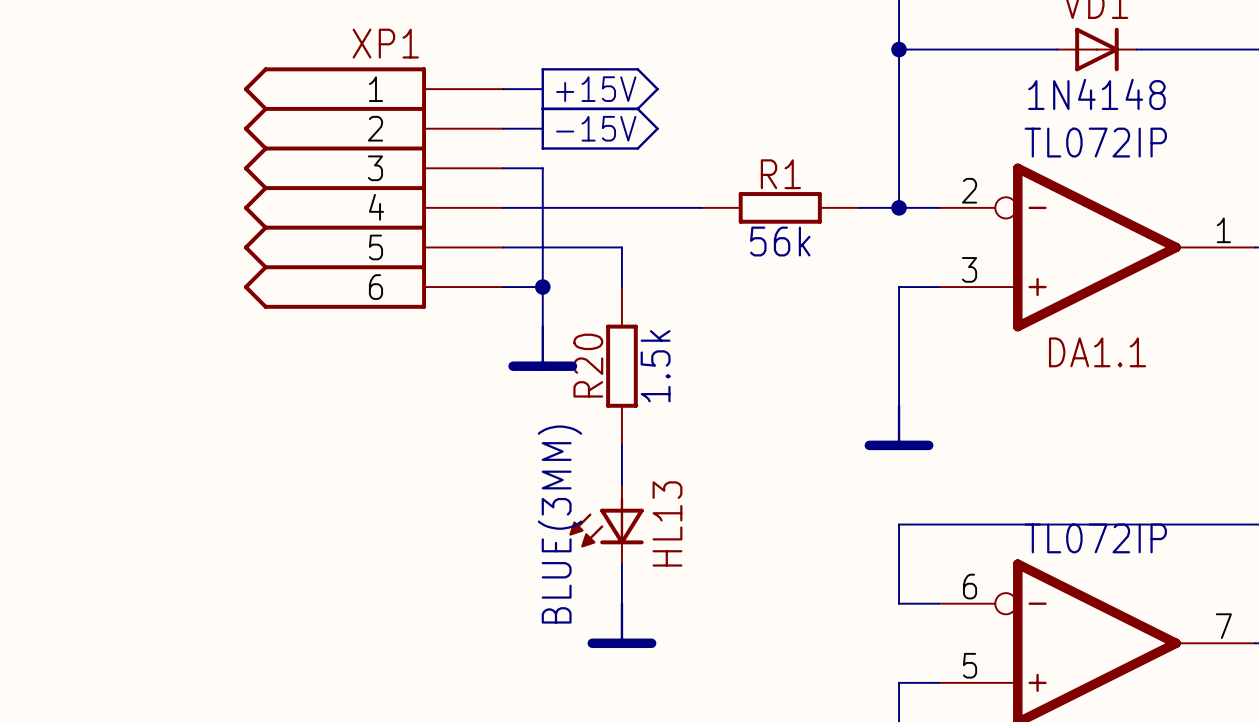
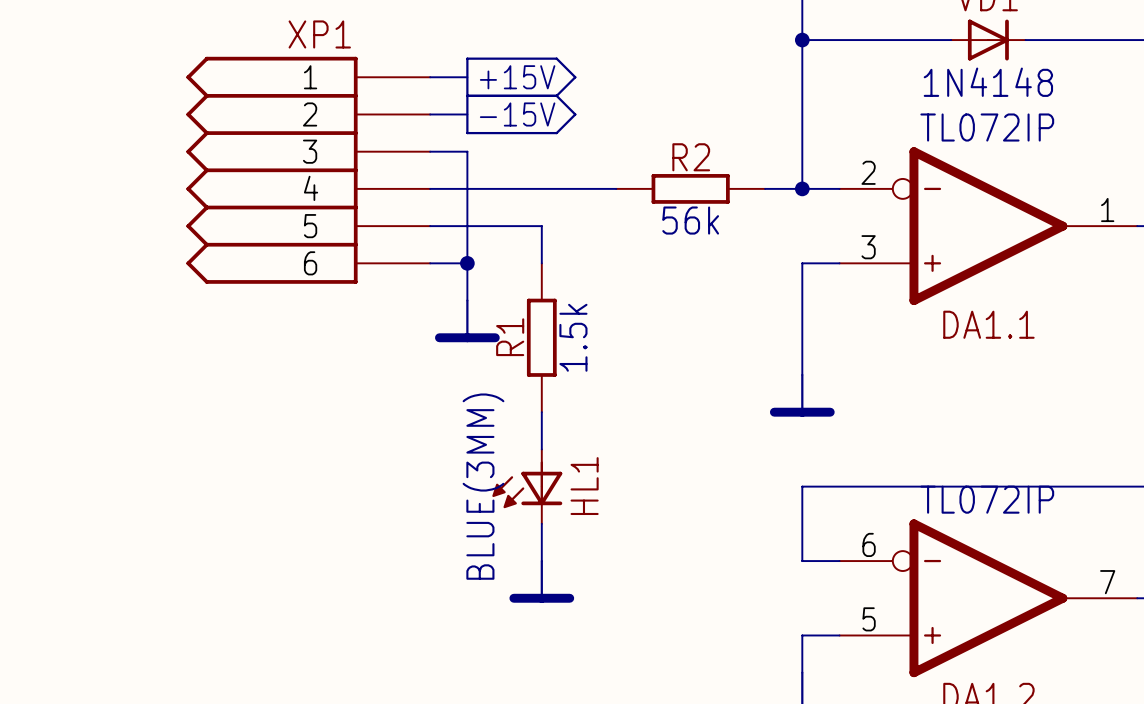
R1 name: R1 (780, 174) -> R2 (691, 157)
R20 name: R20 (588, 365) -> R1 (510, 337)
HL13 name: HL13 (667, 523) -> HL1 (584, 486)

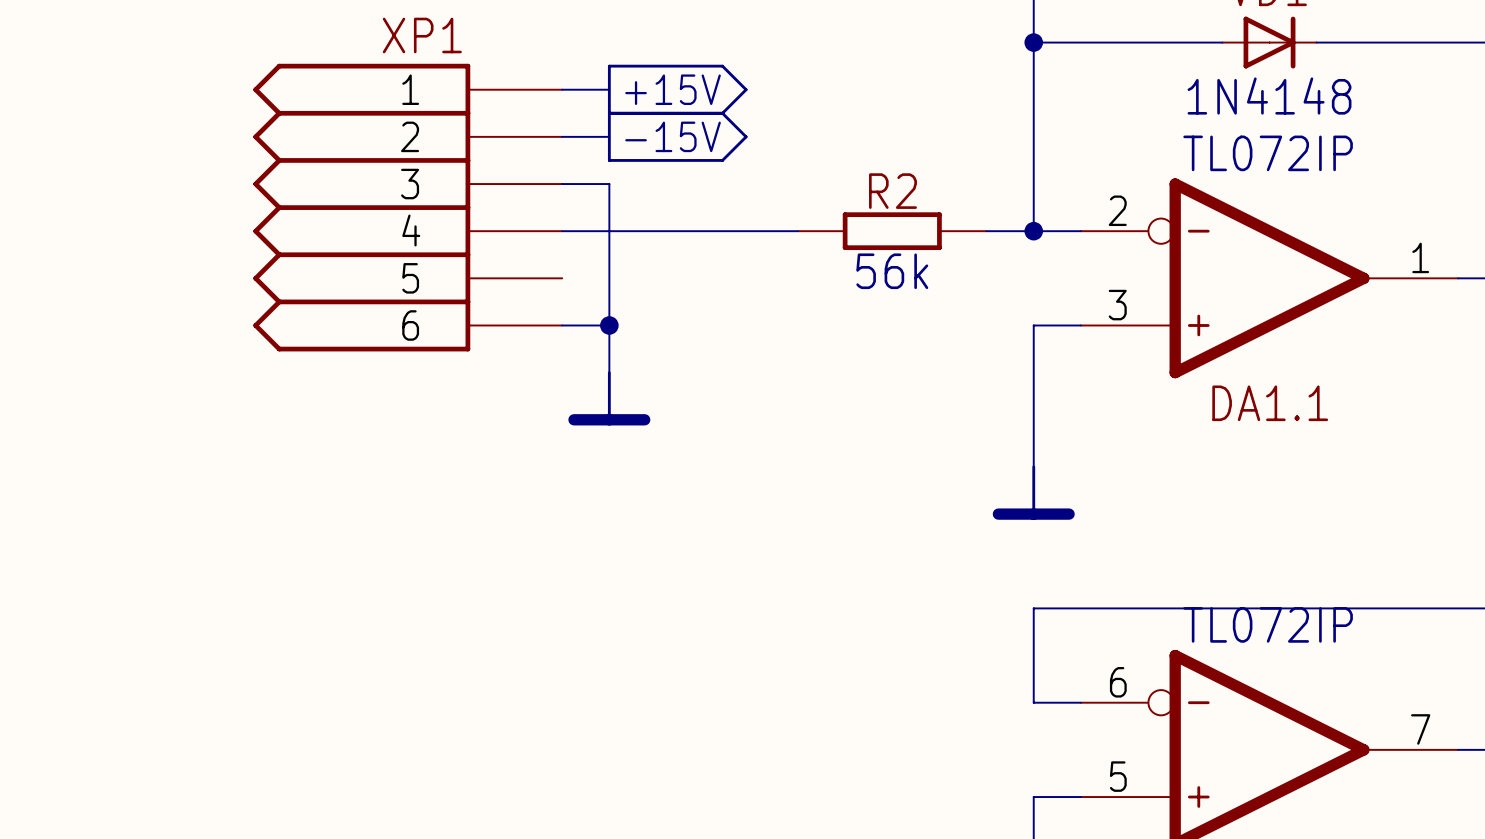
wire: (430, 226) (541, 226) (541, 263) -> none
R1: 1.5k (541, 337) -> none
wire: (541, 412) (541, 449) -> none
HL1: BLUE(3MM) (527, 486) -> none
wire: (541, 523) (541, 561) -> none
power symbol: (541, 581) -> none

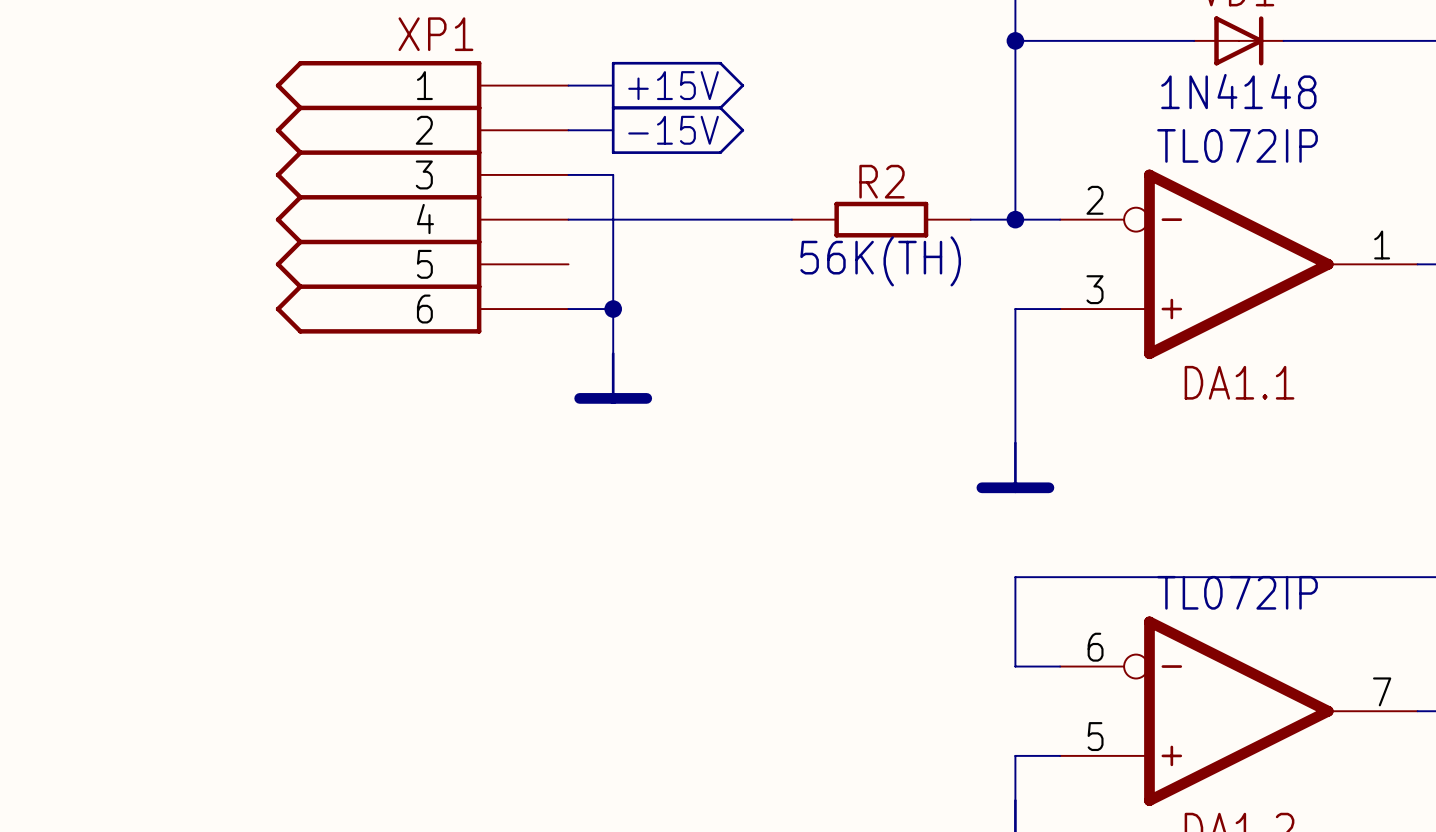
R2 value: 56k (892, 271) -> 56K(TH) (880, 261)

